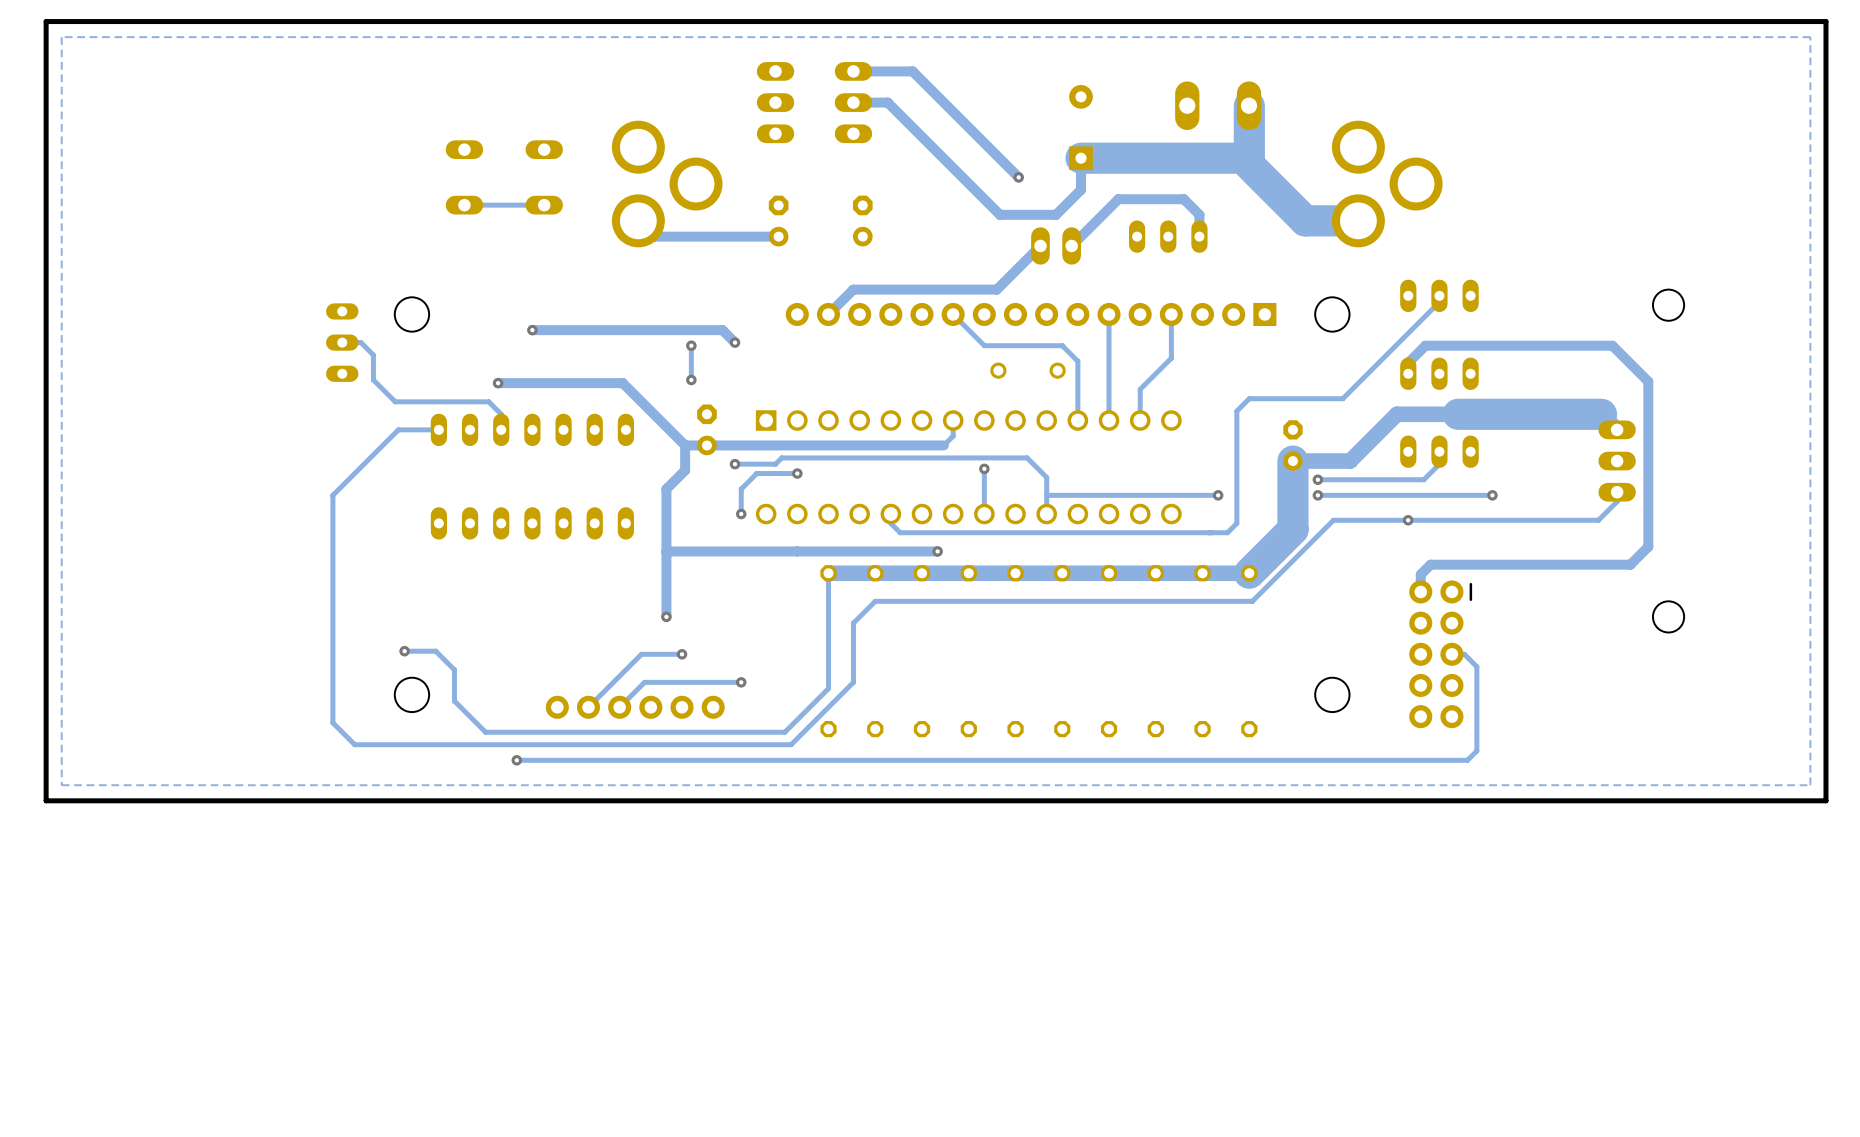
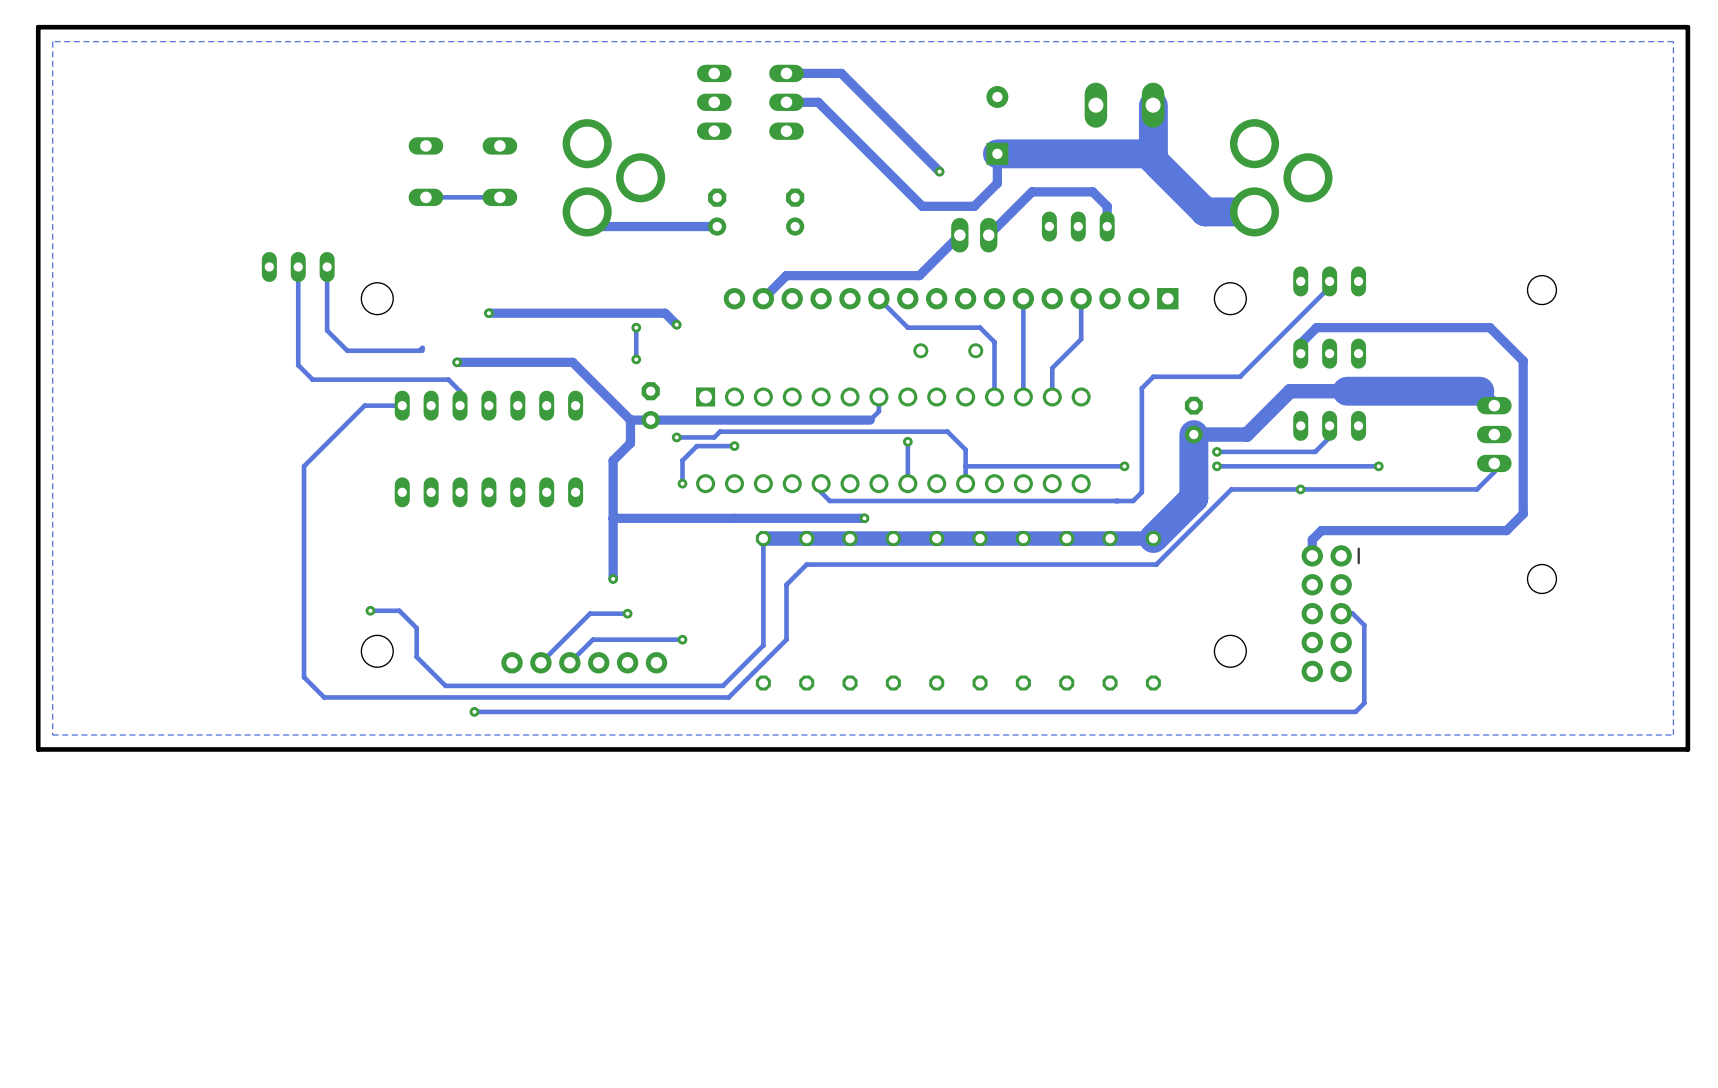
track: none -> (327, 266) (327, 330) (347, 350) (419, 350) (422, 347) (422, 350)
track: (342, 342) (360, 342) (373, 355) (373, 380) (395, 401) -> (298, 266) (298, 365) (312, 379) (361, 379)
part rotation: 0° (342, 342) -> 90° clockwise (298, 266)
part position: (342, 342) -> (298, 266)

